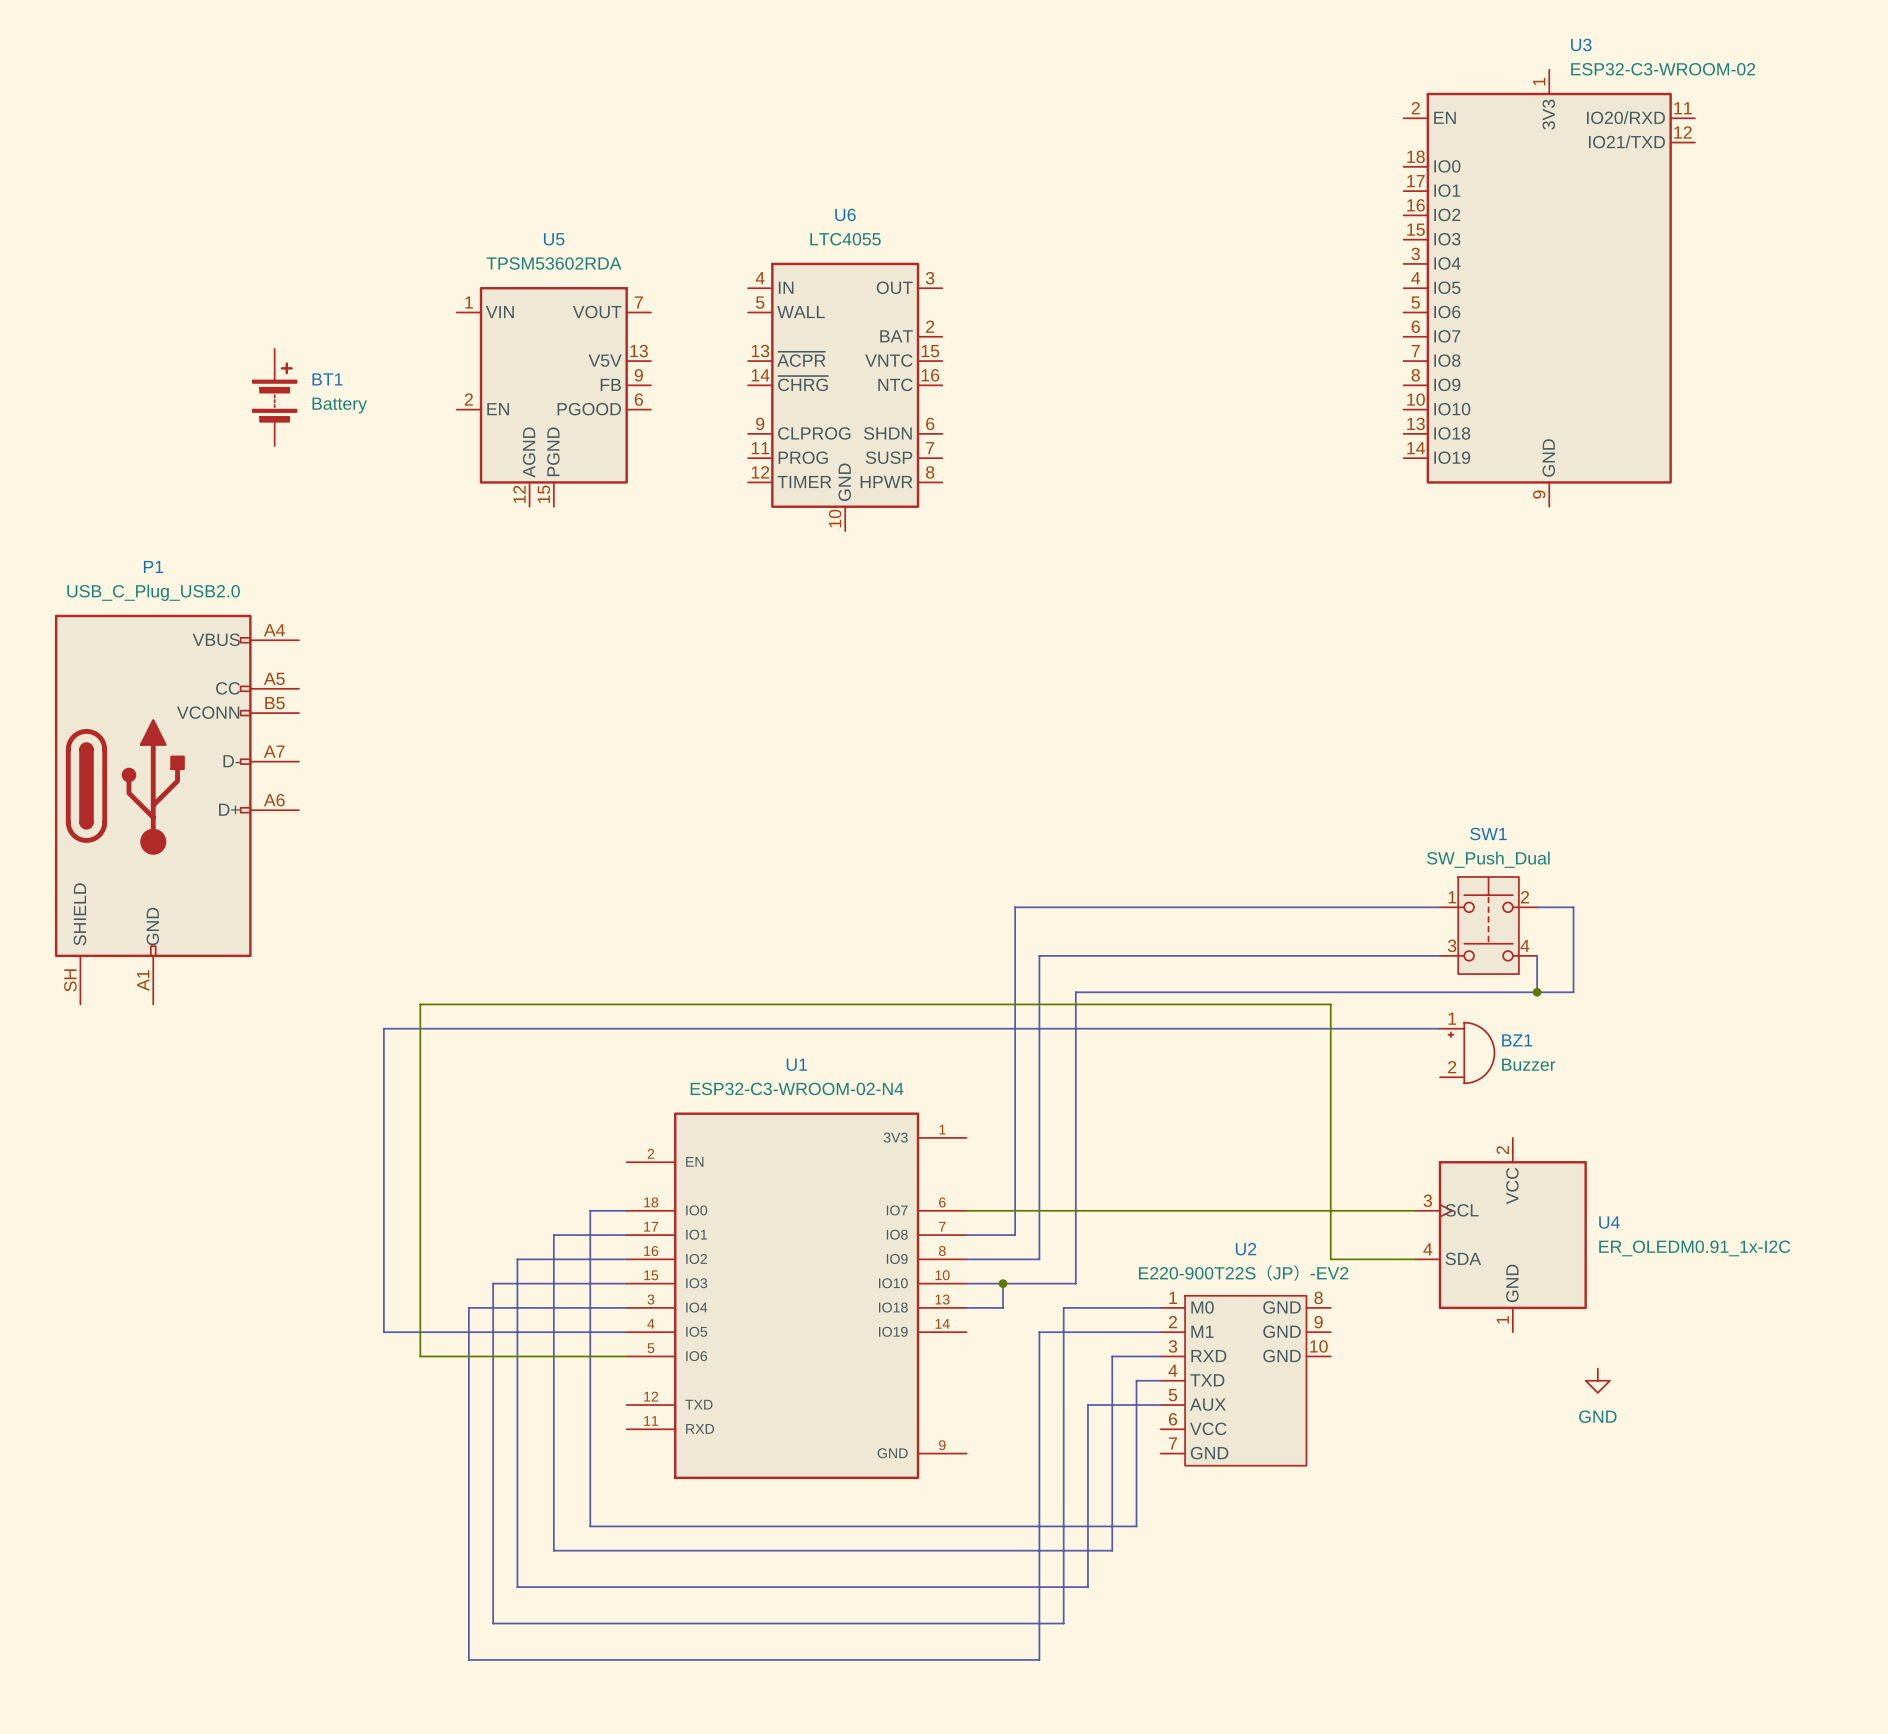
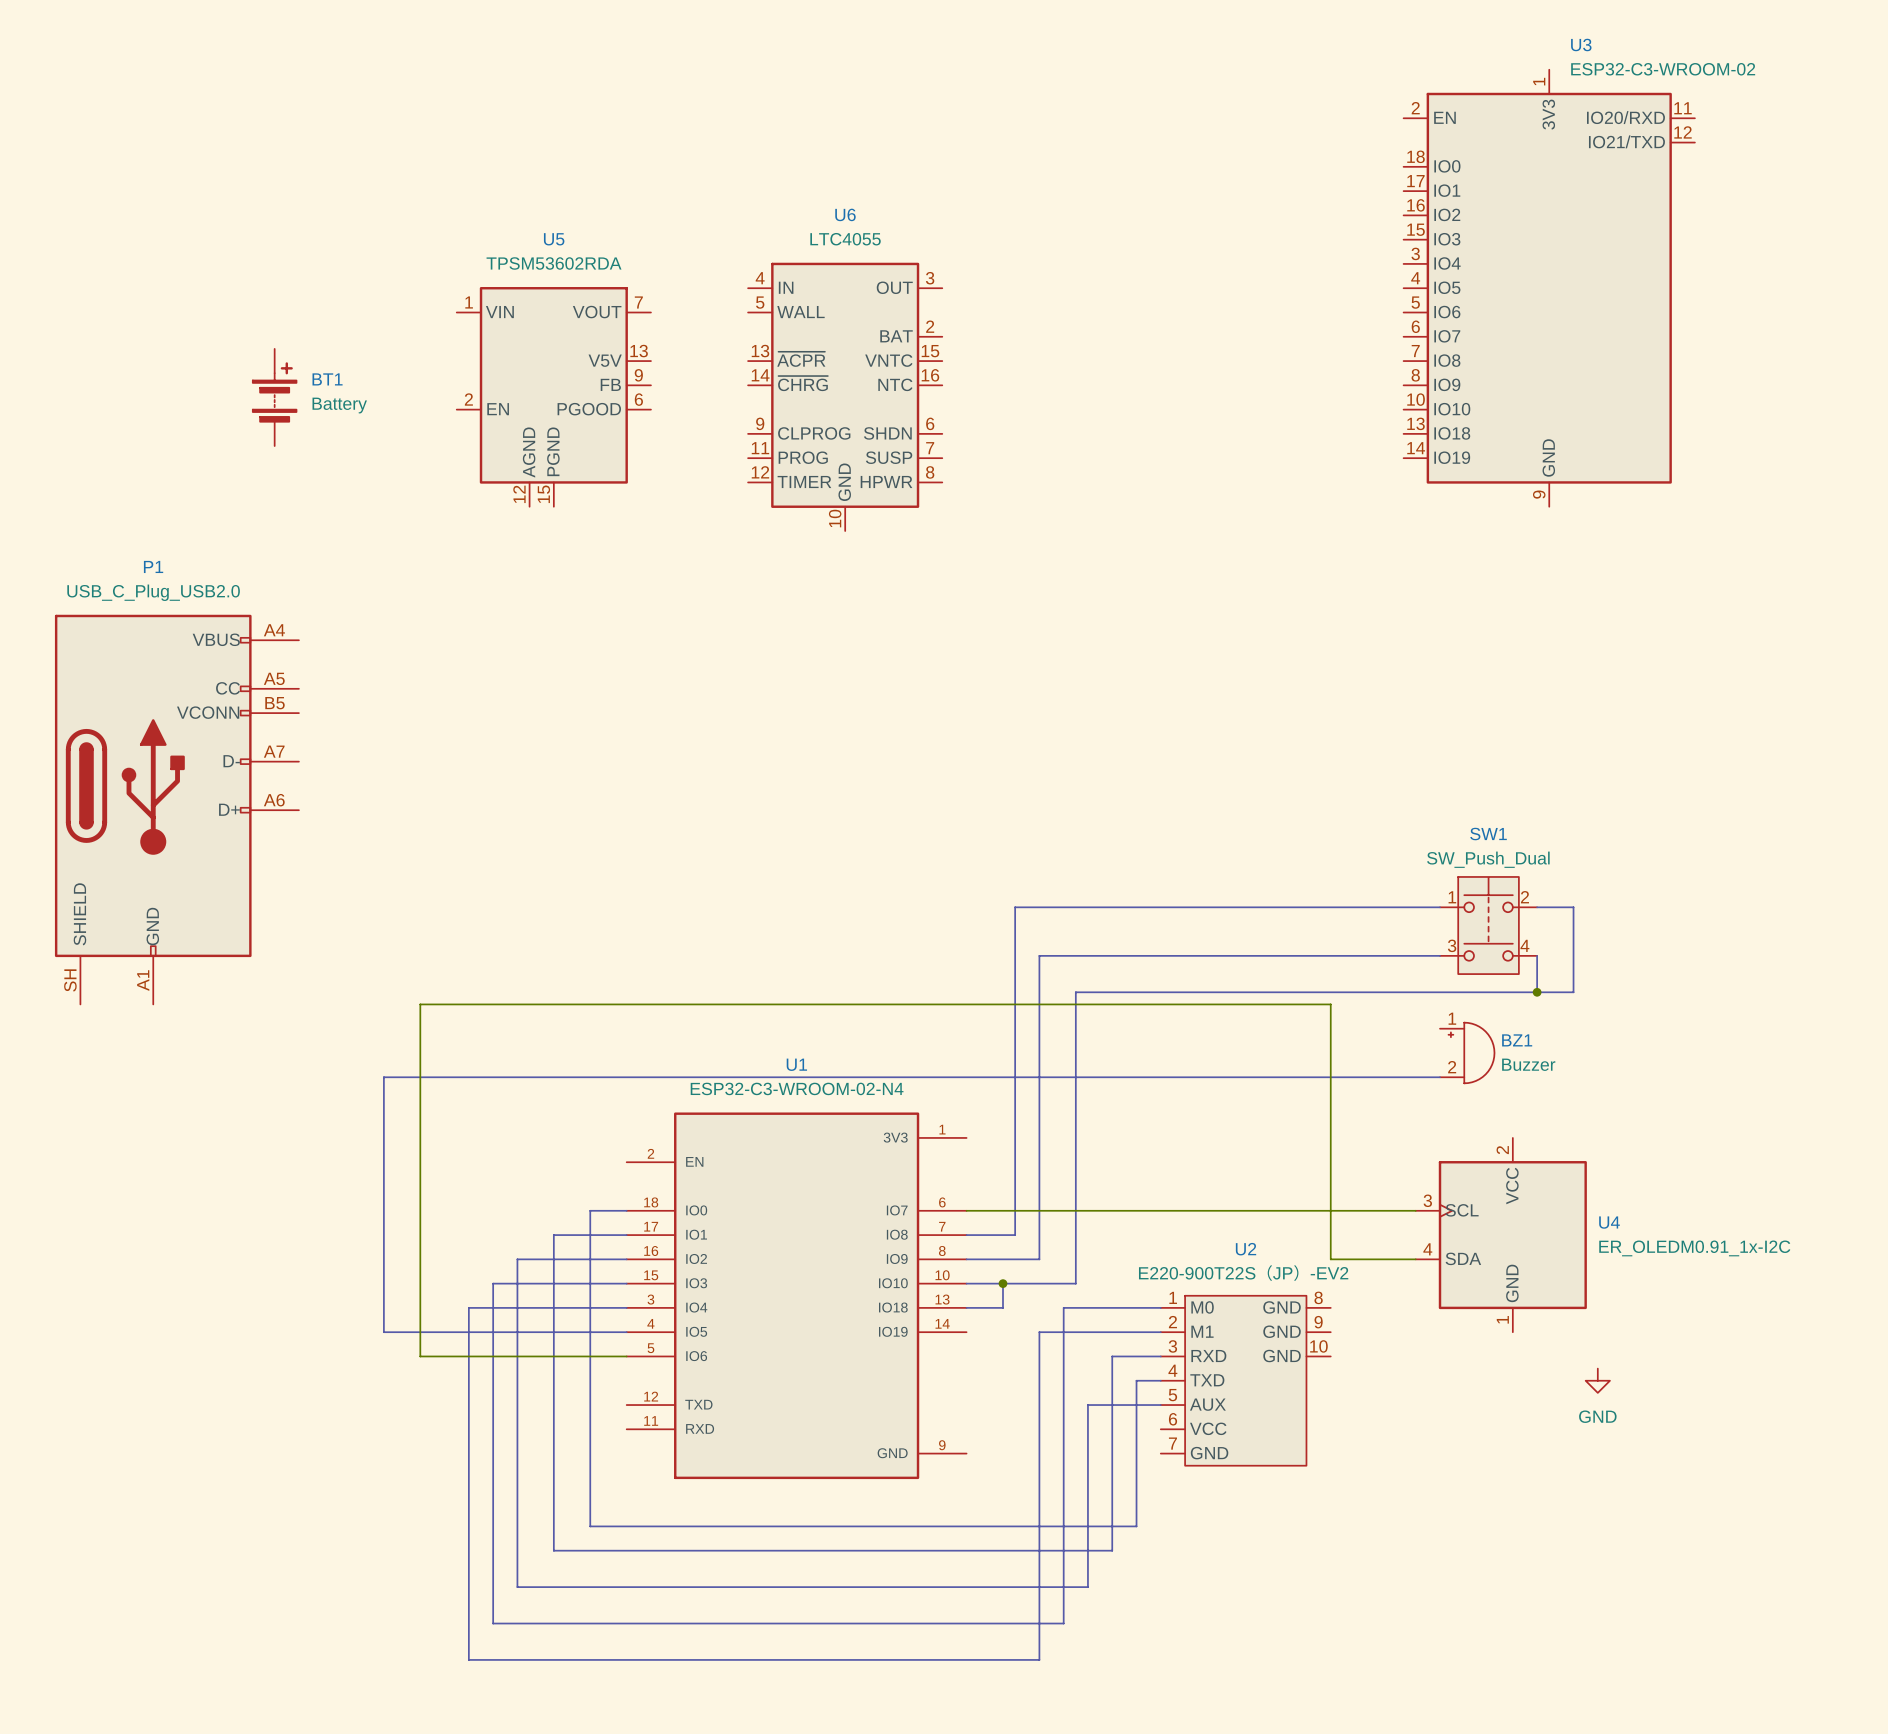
bus: (1440, 1028) (383, 1028) (383, 1077) -> (1440, 1077) (383, 1077)

